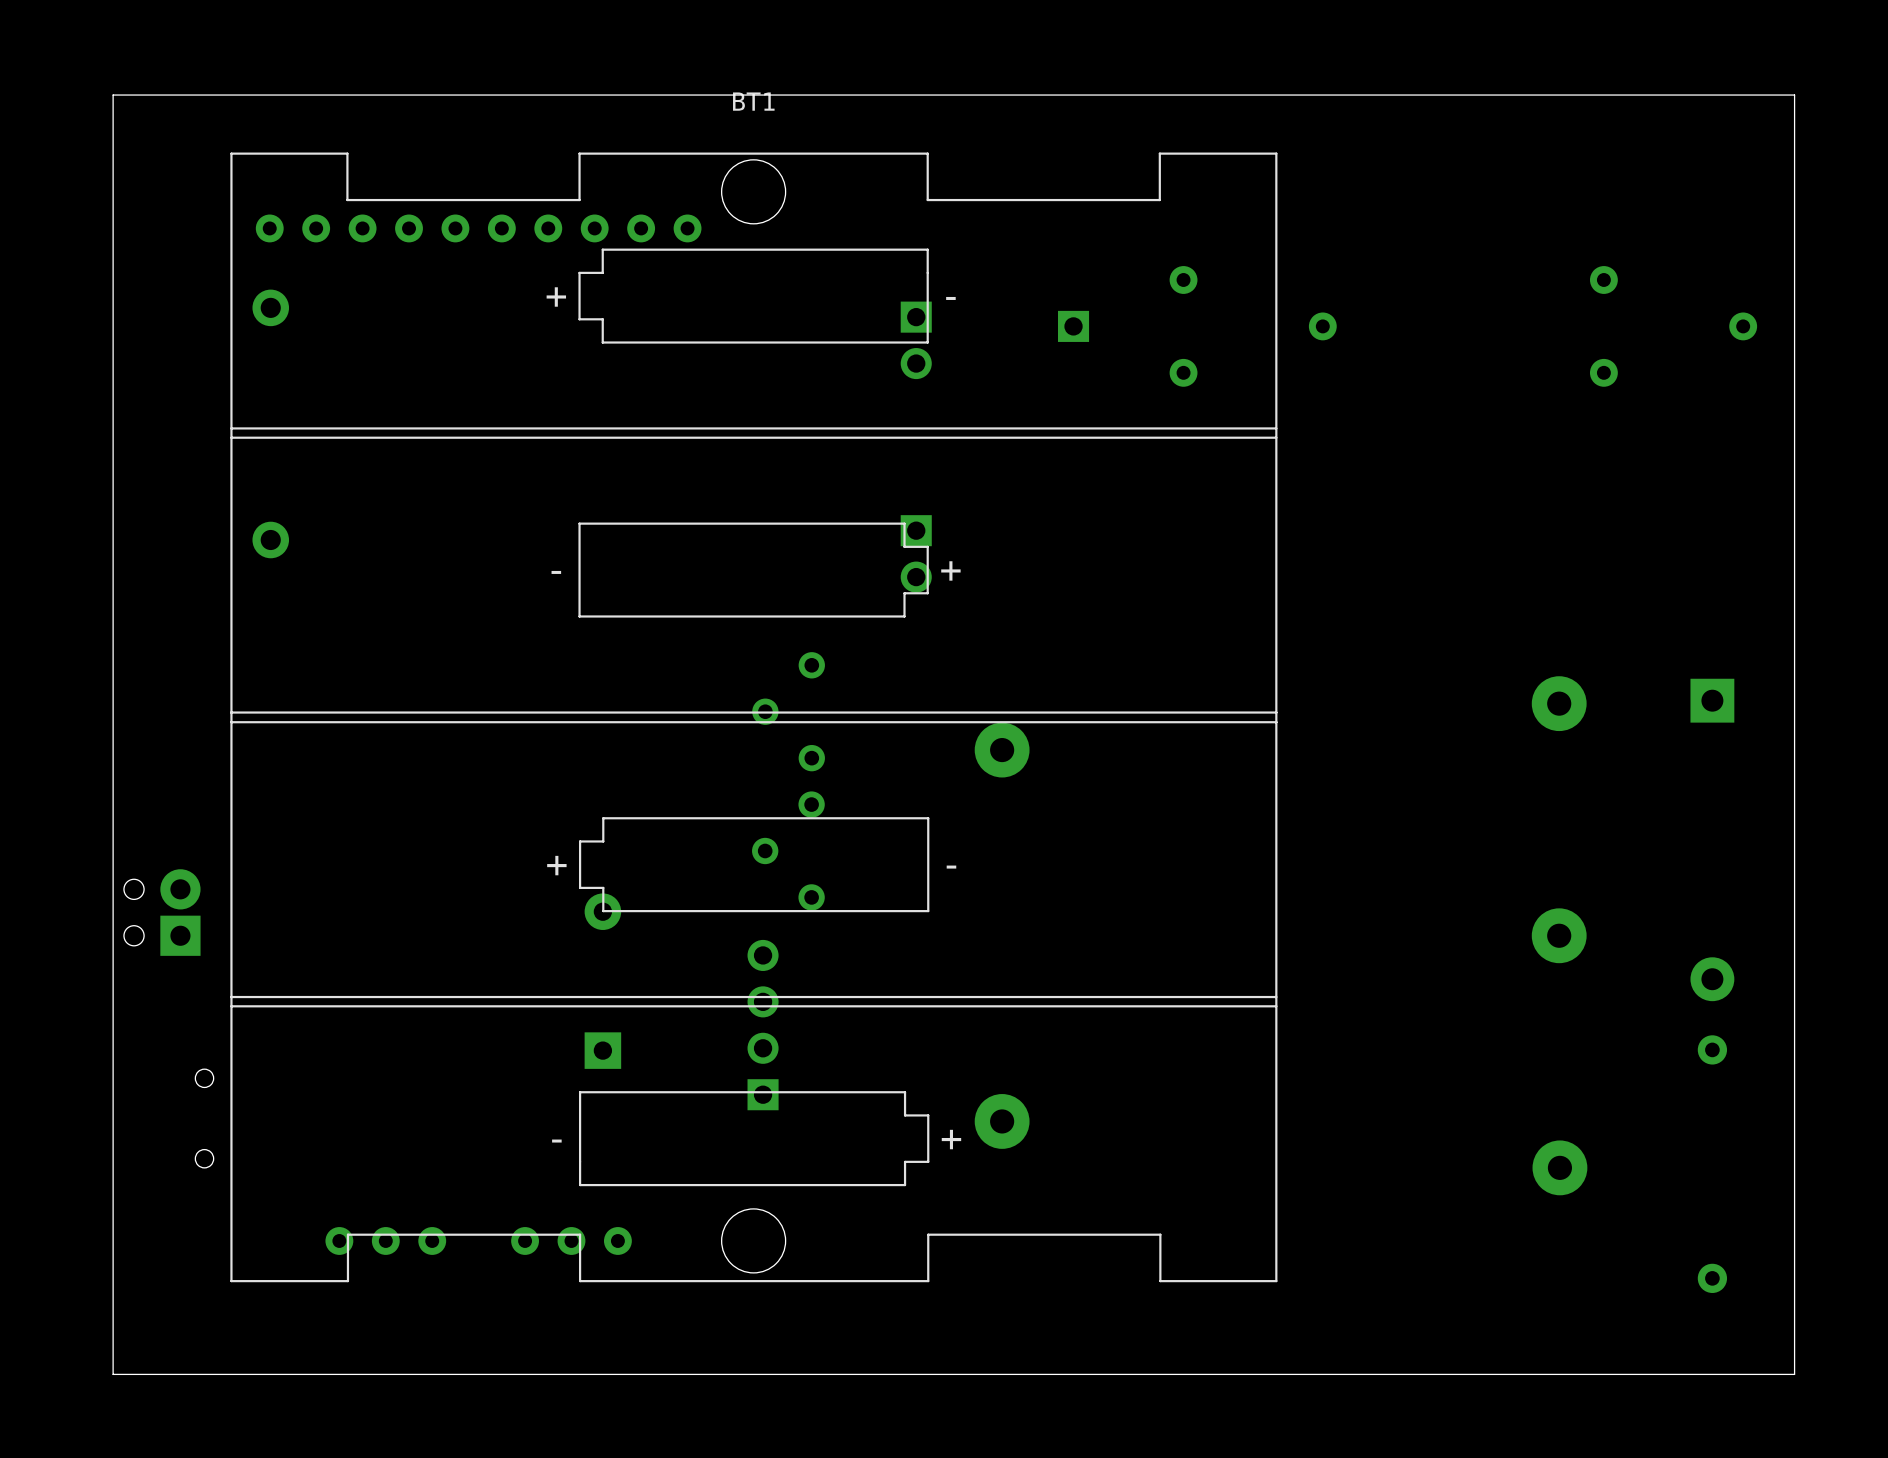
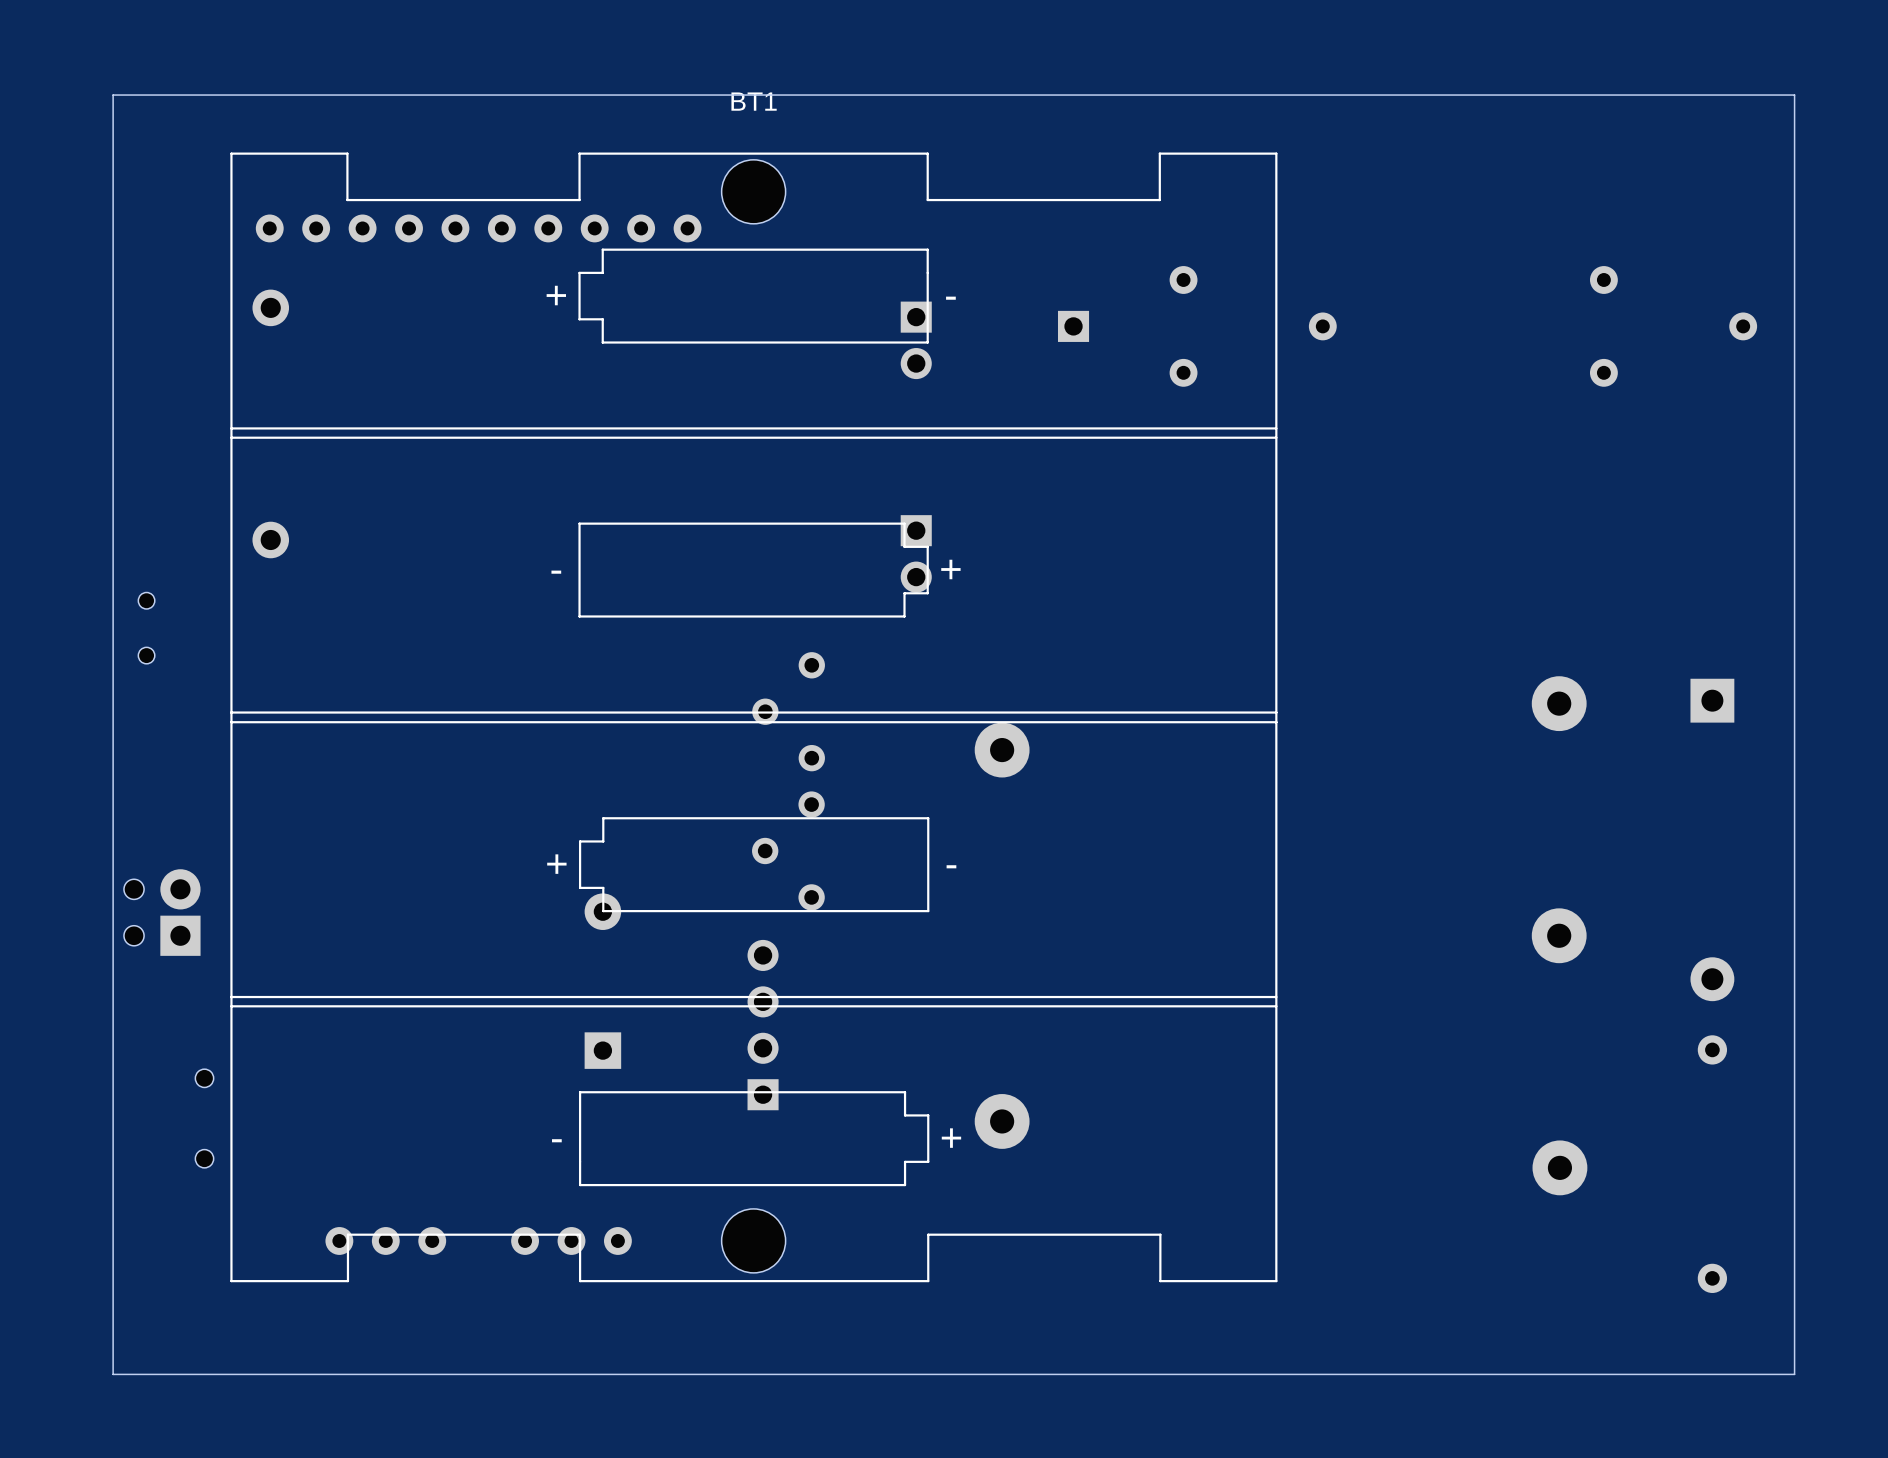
part: none -> (146, 628)

